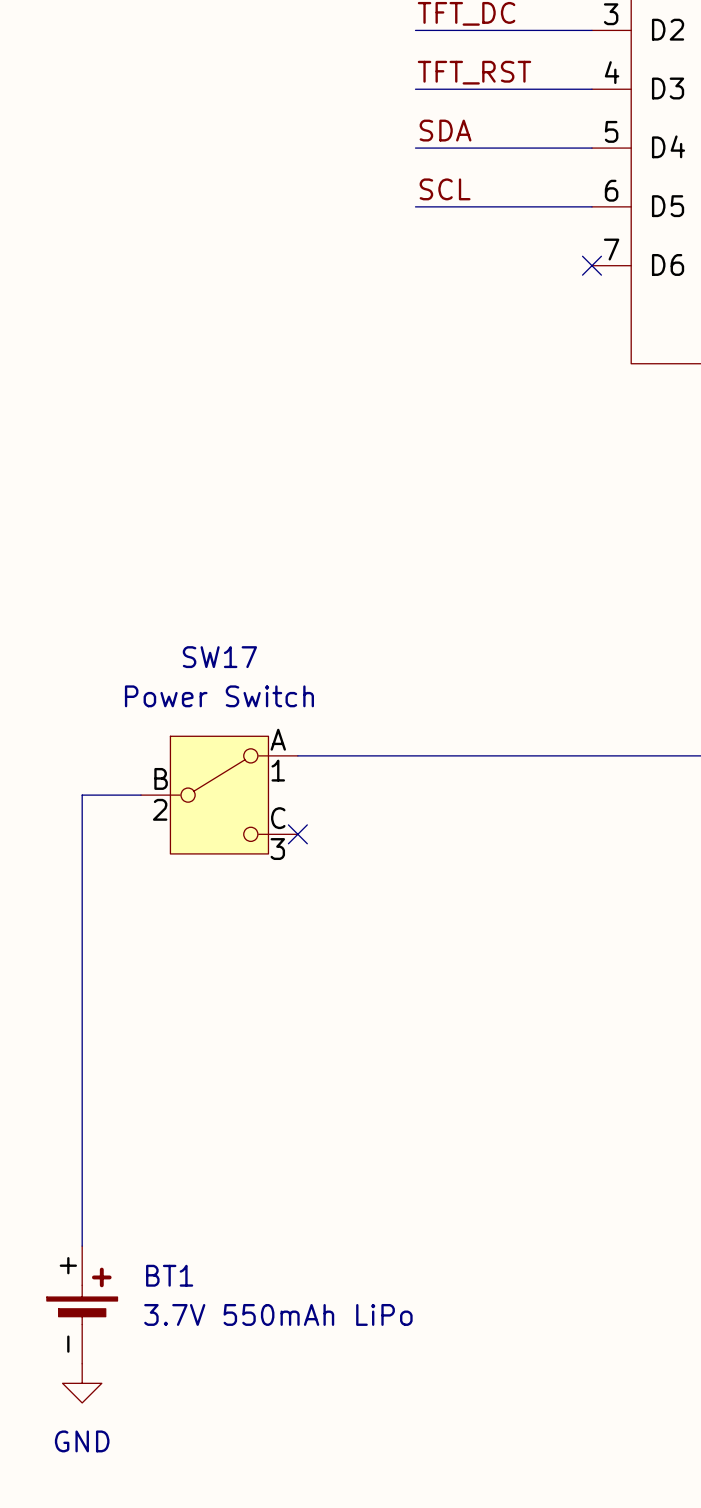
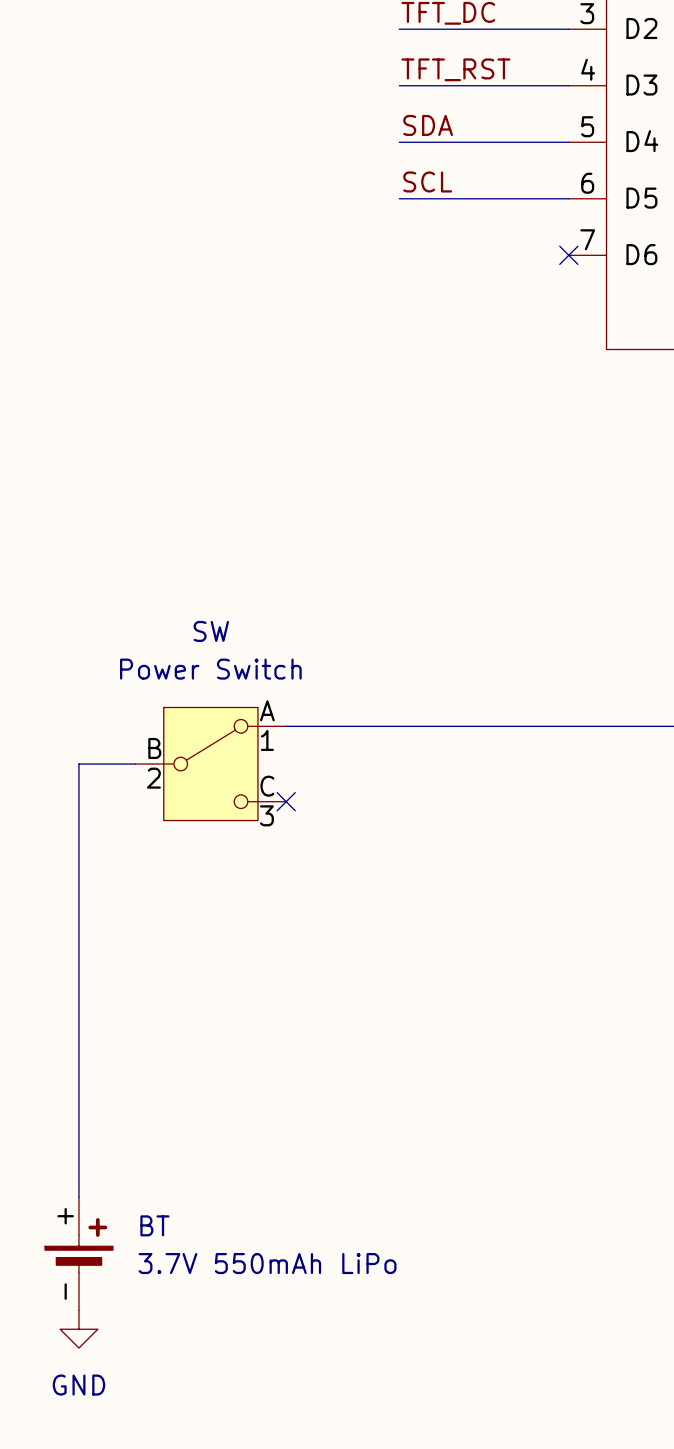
SW17 name: SW17 (219, 657) -> SW (211, 631)
BT1 name: BT1 (169, 1275) -> BT (154, 1225)

